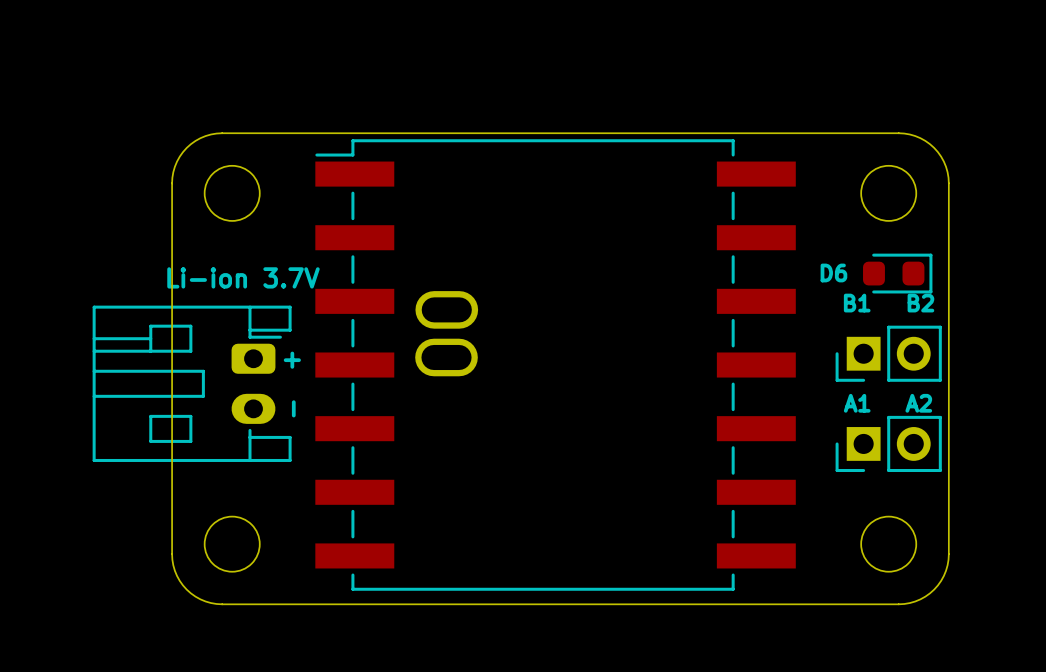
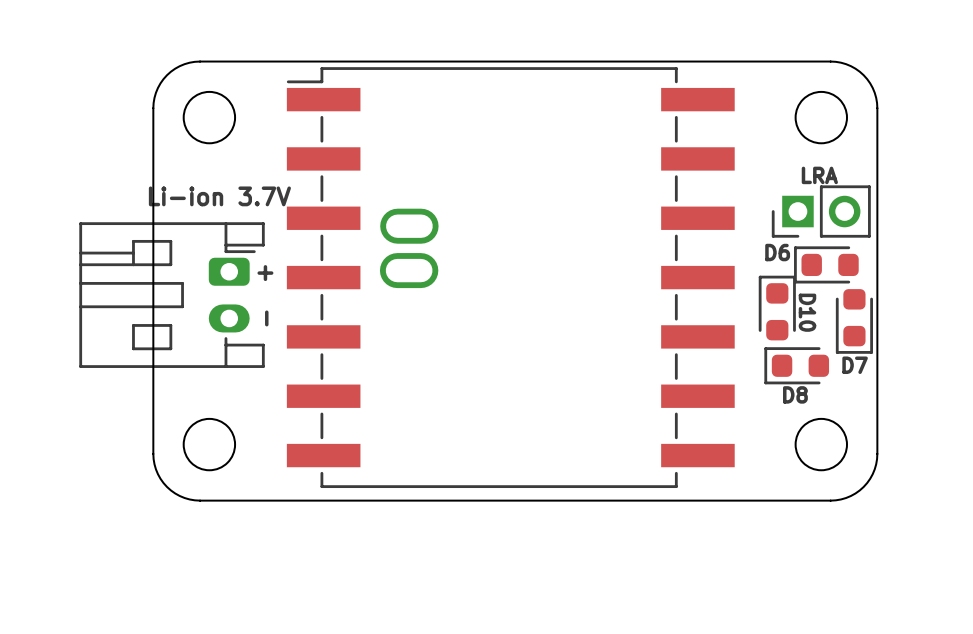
part footprint: [863, 253, 933, 294] -> [771, 185, 871, 238]
text: none -> LRA (819, 175)
text position: D6 (833, 272) -> D6 (777, 252)
text: B1 B2 (889, 303) -> none
part footprint: [835, 325, 942, 382] -> [794, 246, 859, 284]
part: none -> (777, 308)
text: A1 A2 (887, 403) -> D10 (807, 312)
part: none -> (854, 321)
part: (888, 443) -> none
part: none -> (796, 365)
text: none -> D7 (855, 365)
text: none -> D8 (795, 394)

